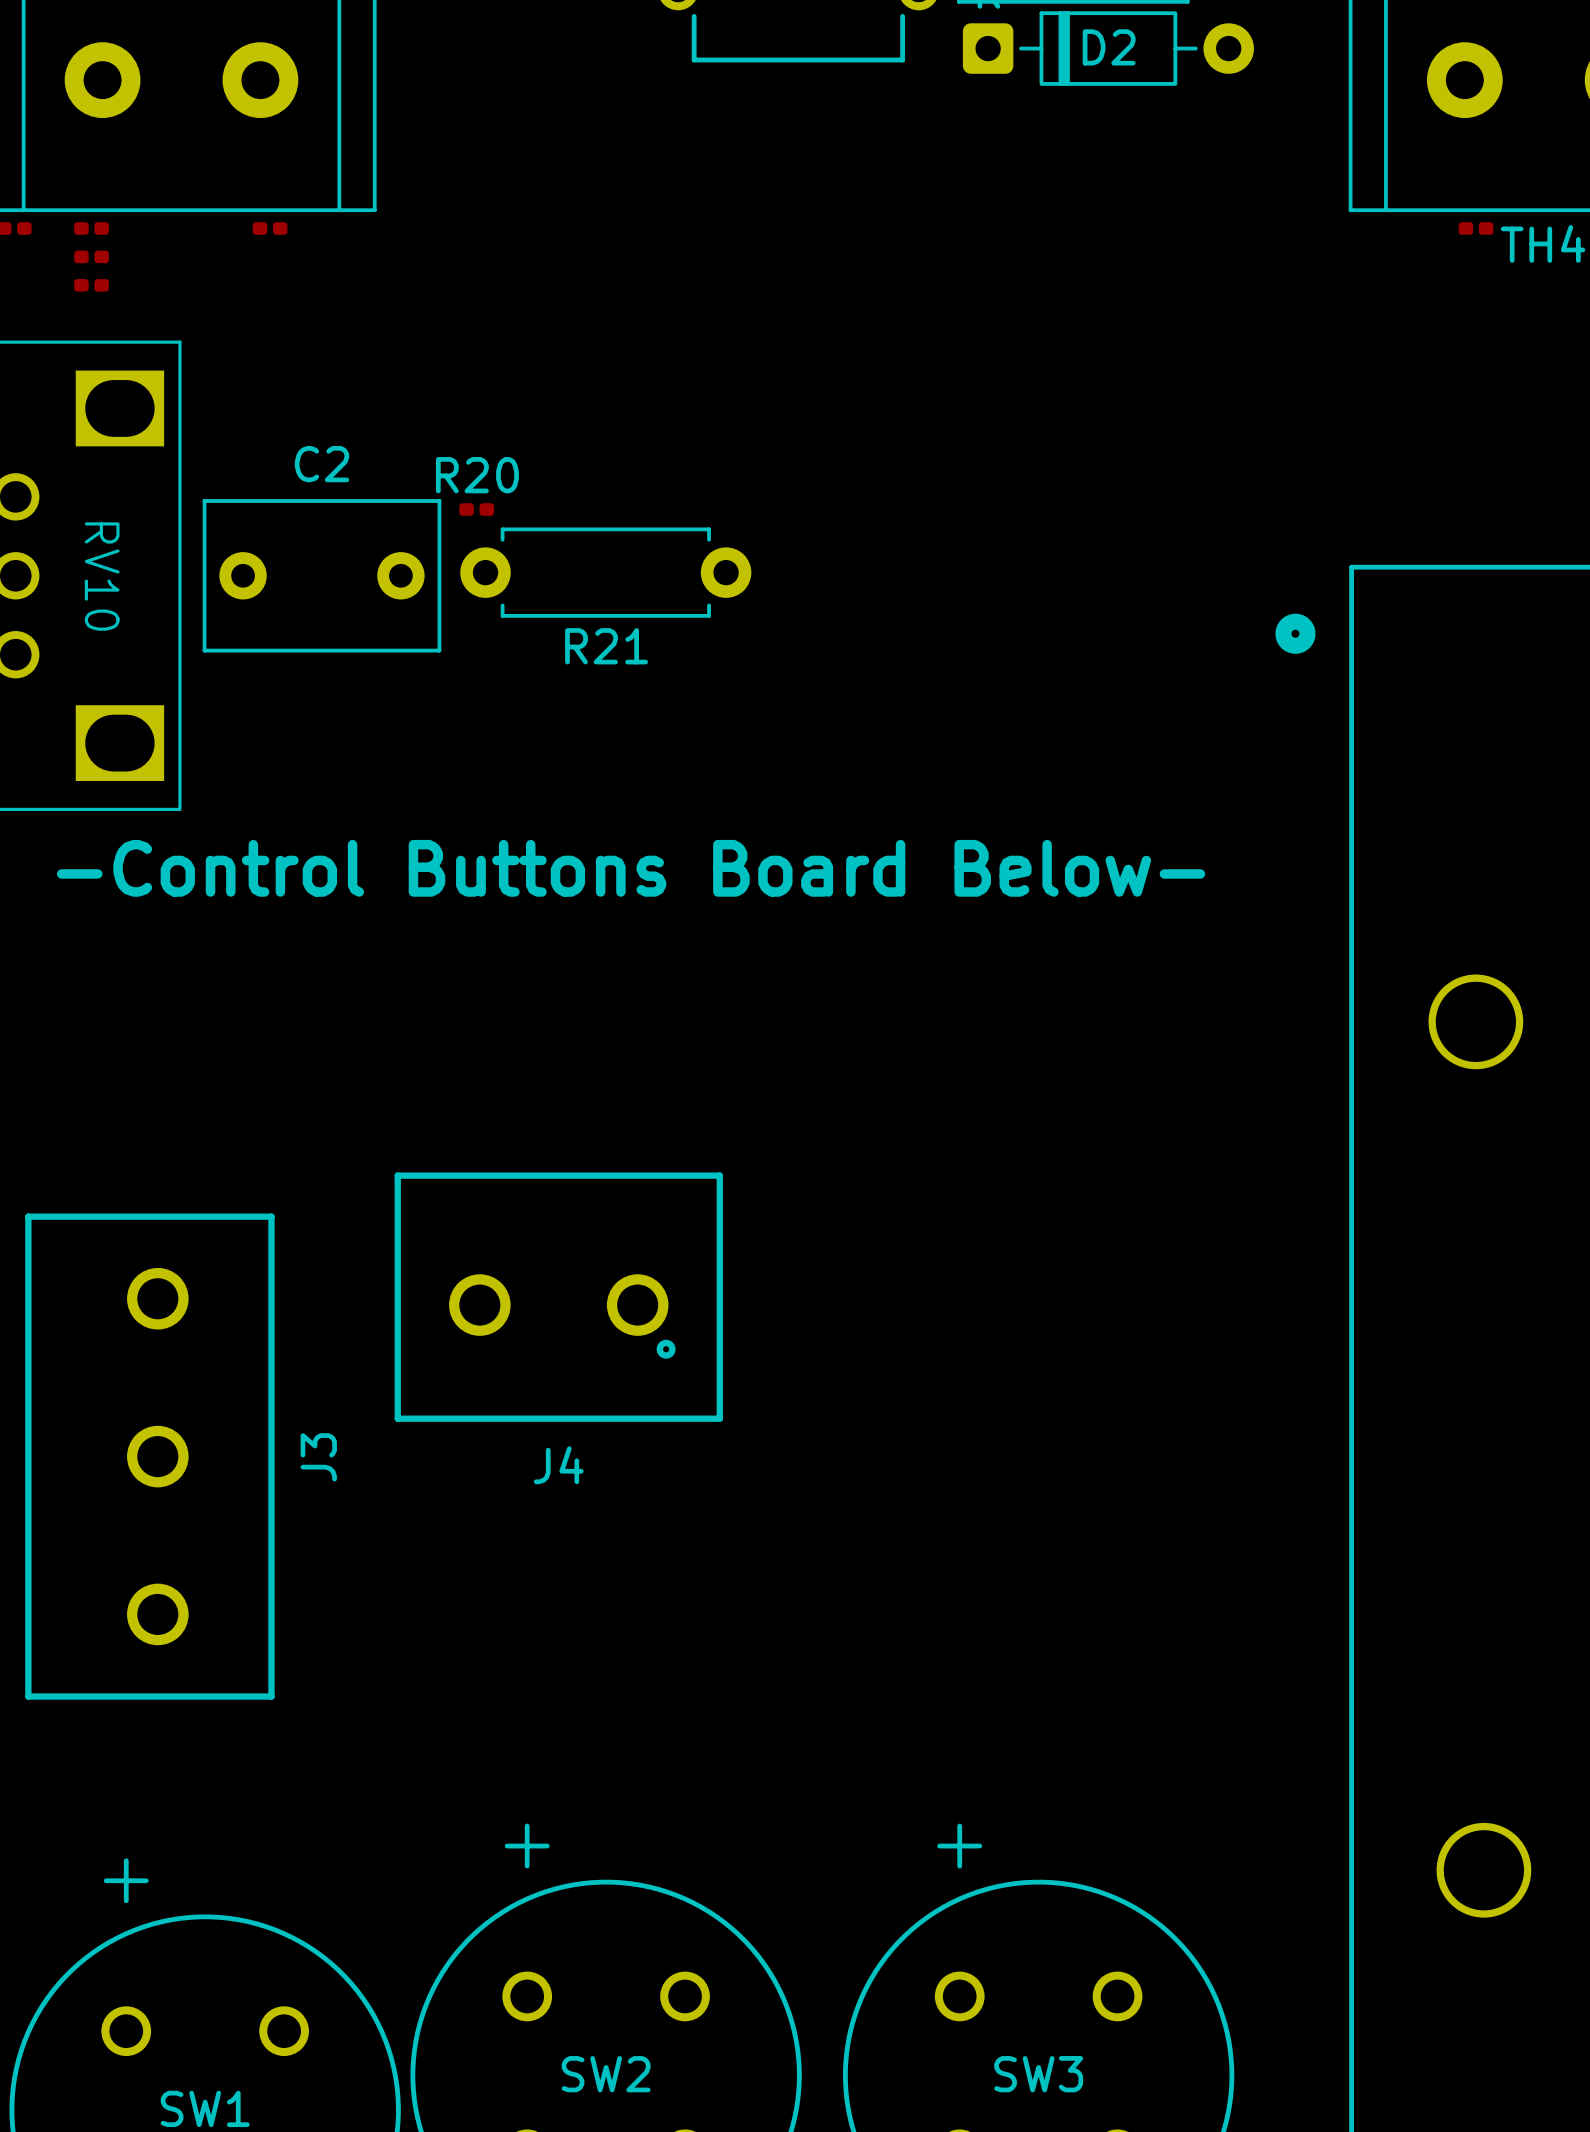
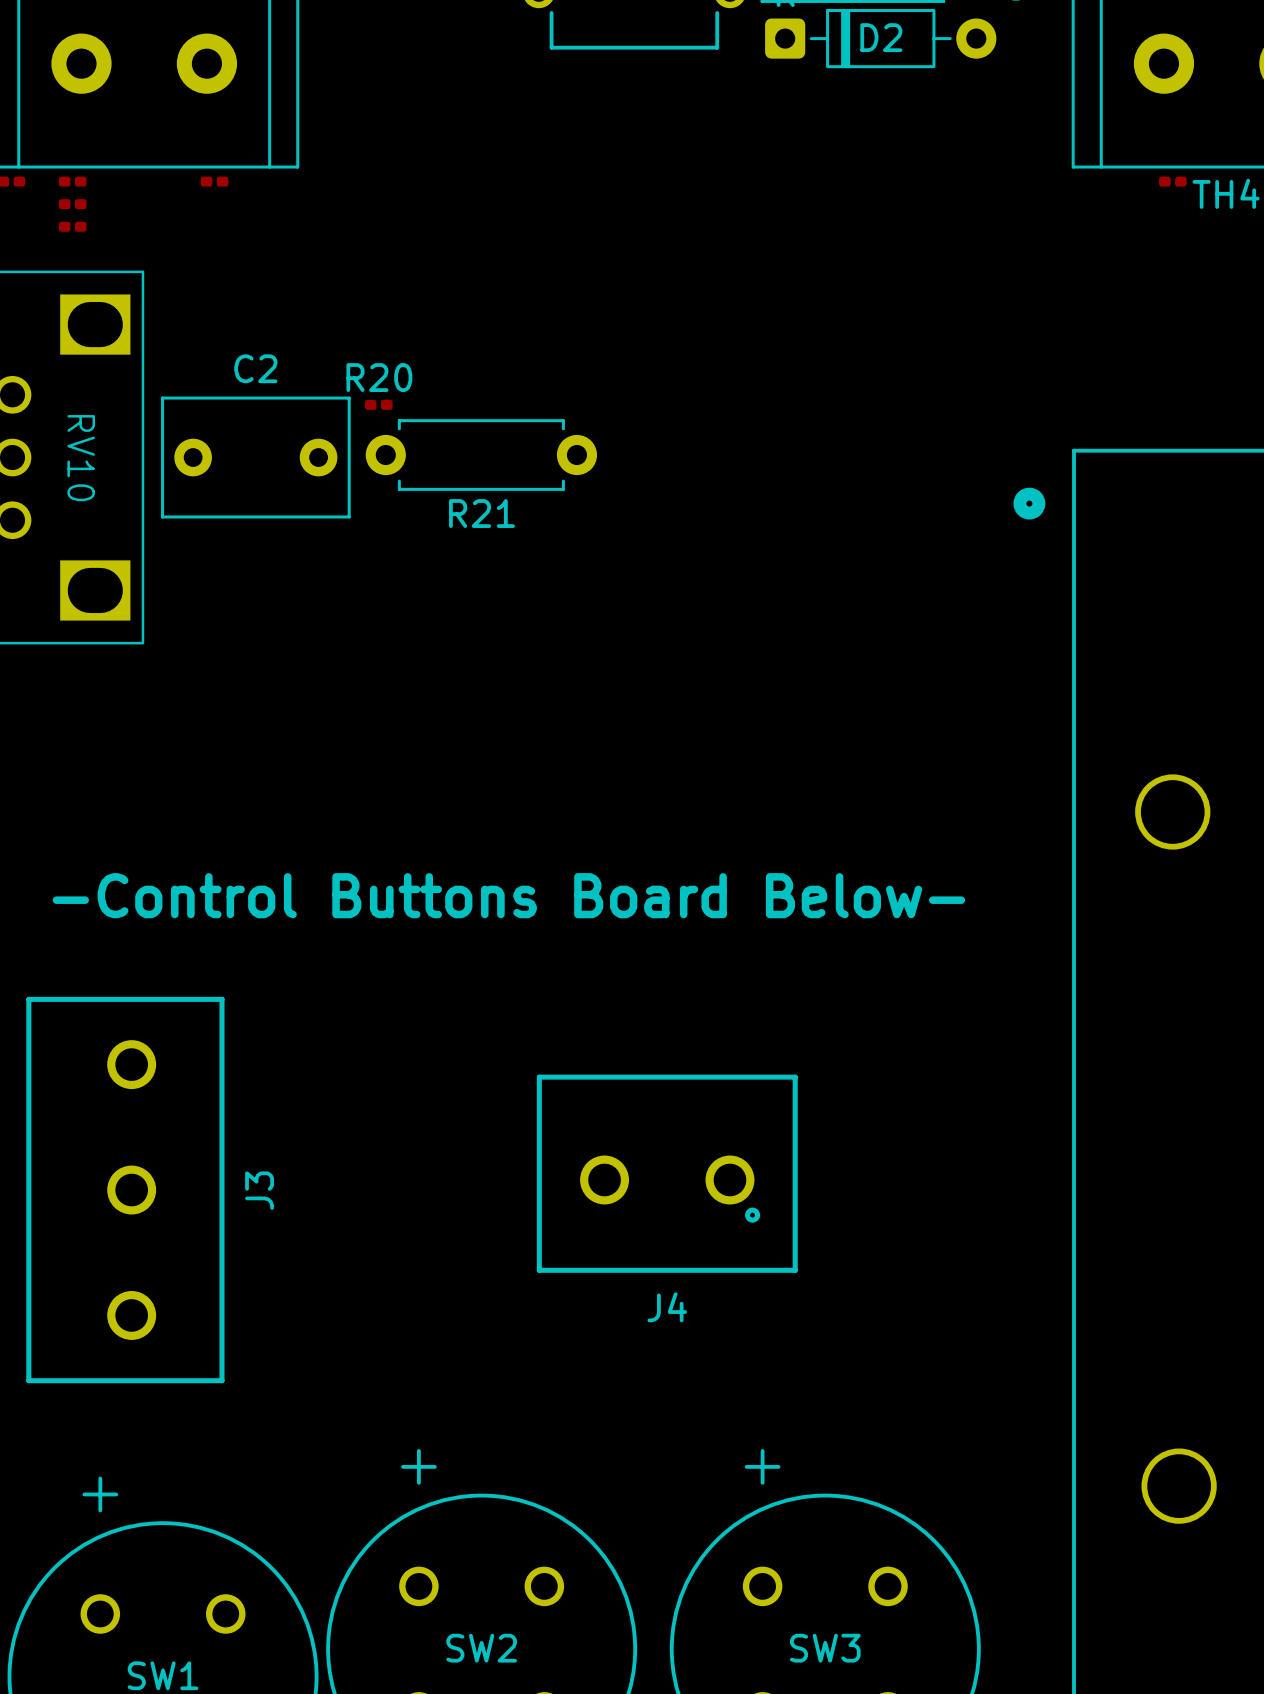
text position: -Control Buttons Board Below- (631, 868) -> -Control Buttons Board Below- (508, 895)
J4 position: (558, 1297) -> (667, 1173)
J3 position: (149, 1456) -> (125, 1190)

